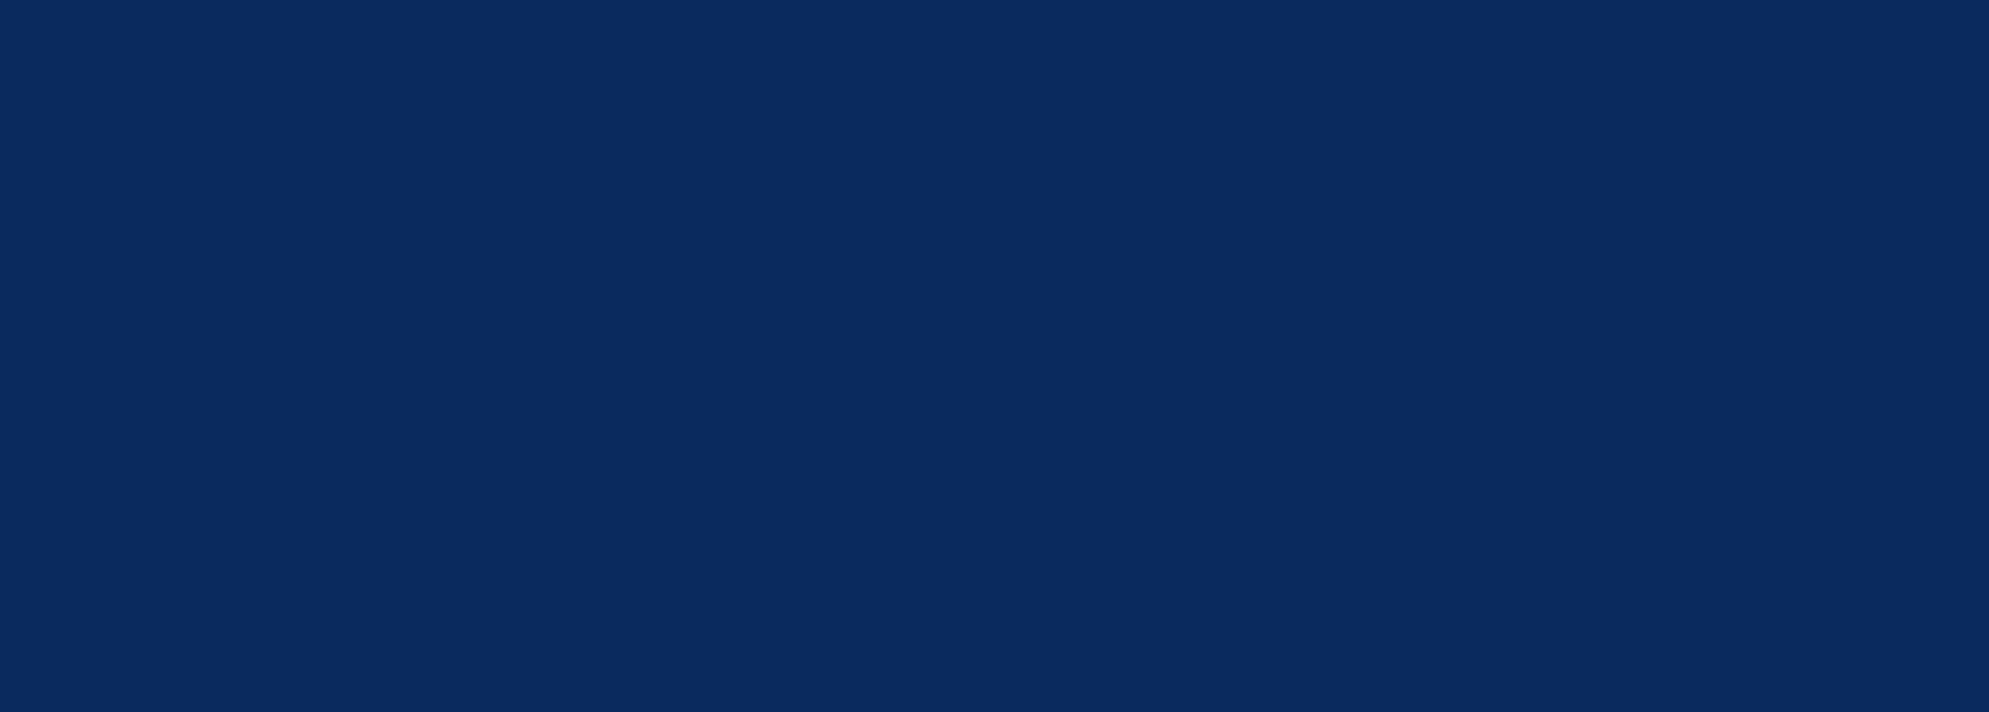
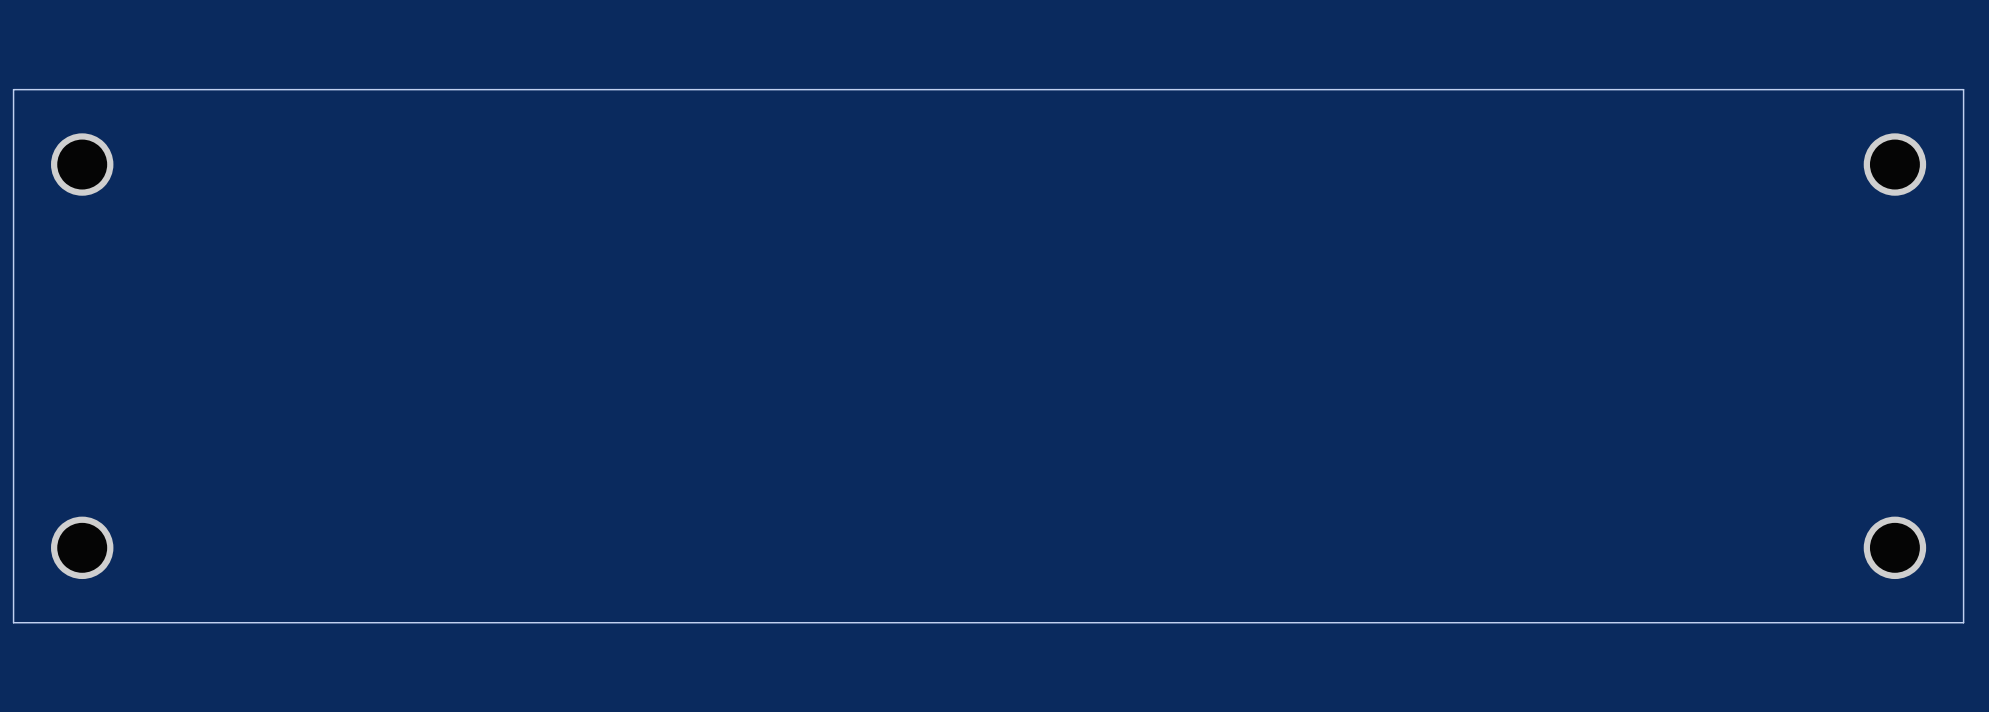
board edge: none -> (1963, 89) (1963, 622) (13, 622) (13, 89) (1963, 89)
part: none -> (82, 164)
part: none -> (1894, 164)
part: none -> (82, 547)
part: none -> (1894, 547)

